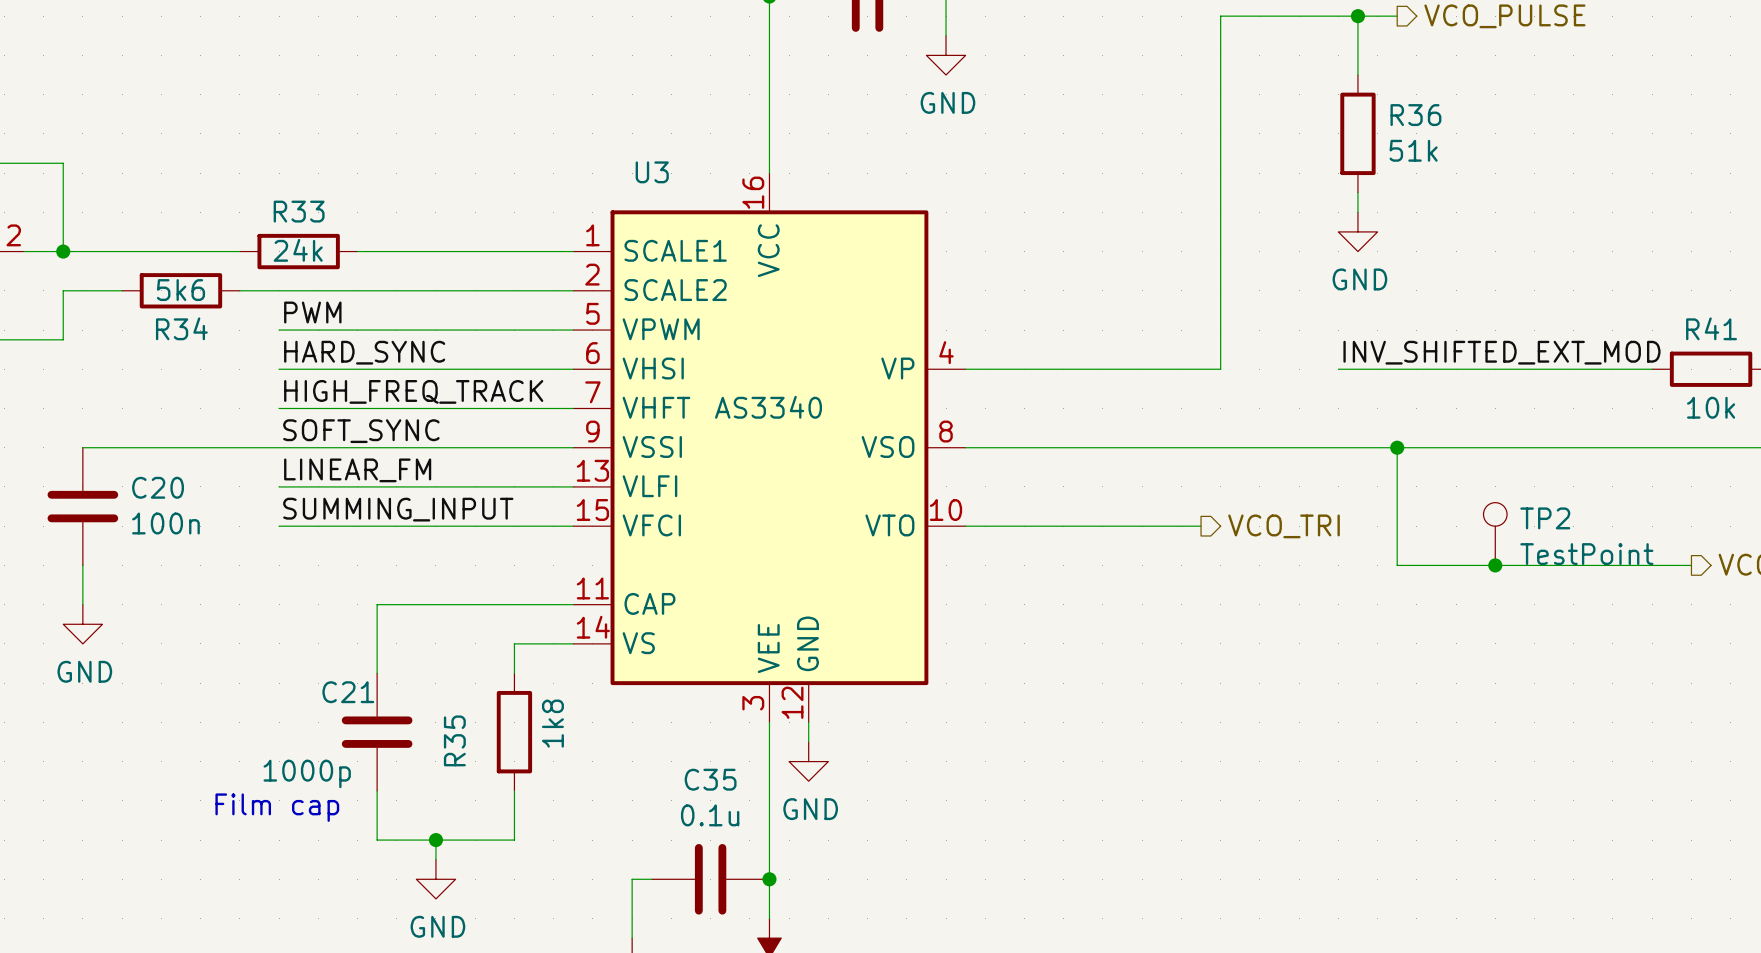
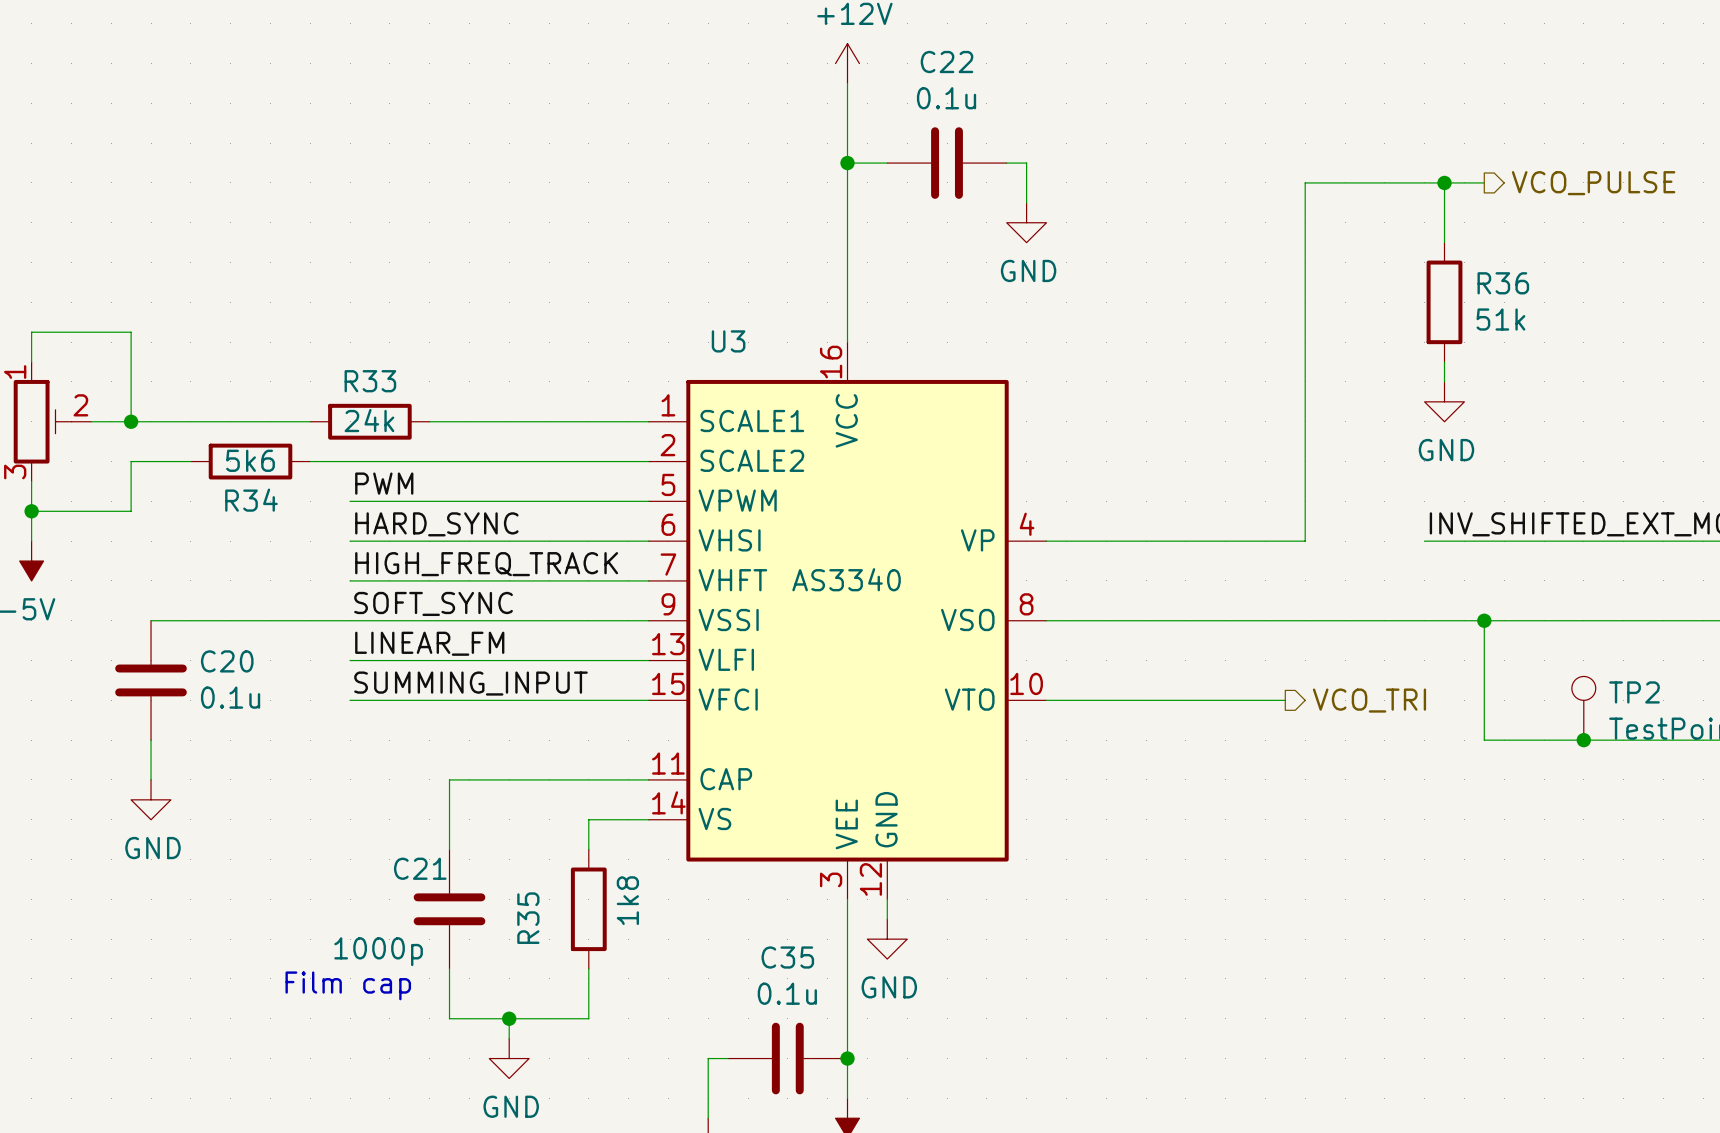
C20 value: 100n (165, 523) -> 0.1u (230, 697)

